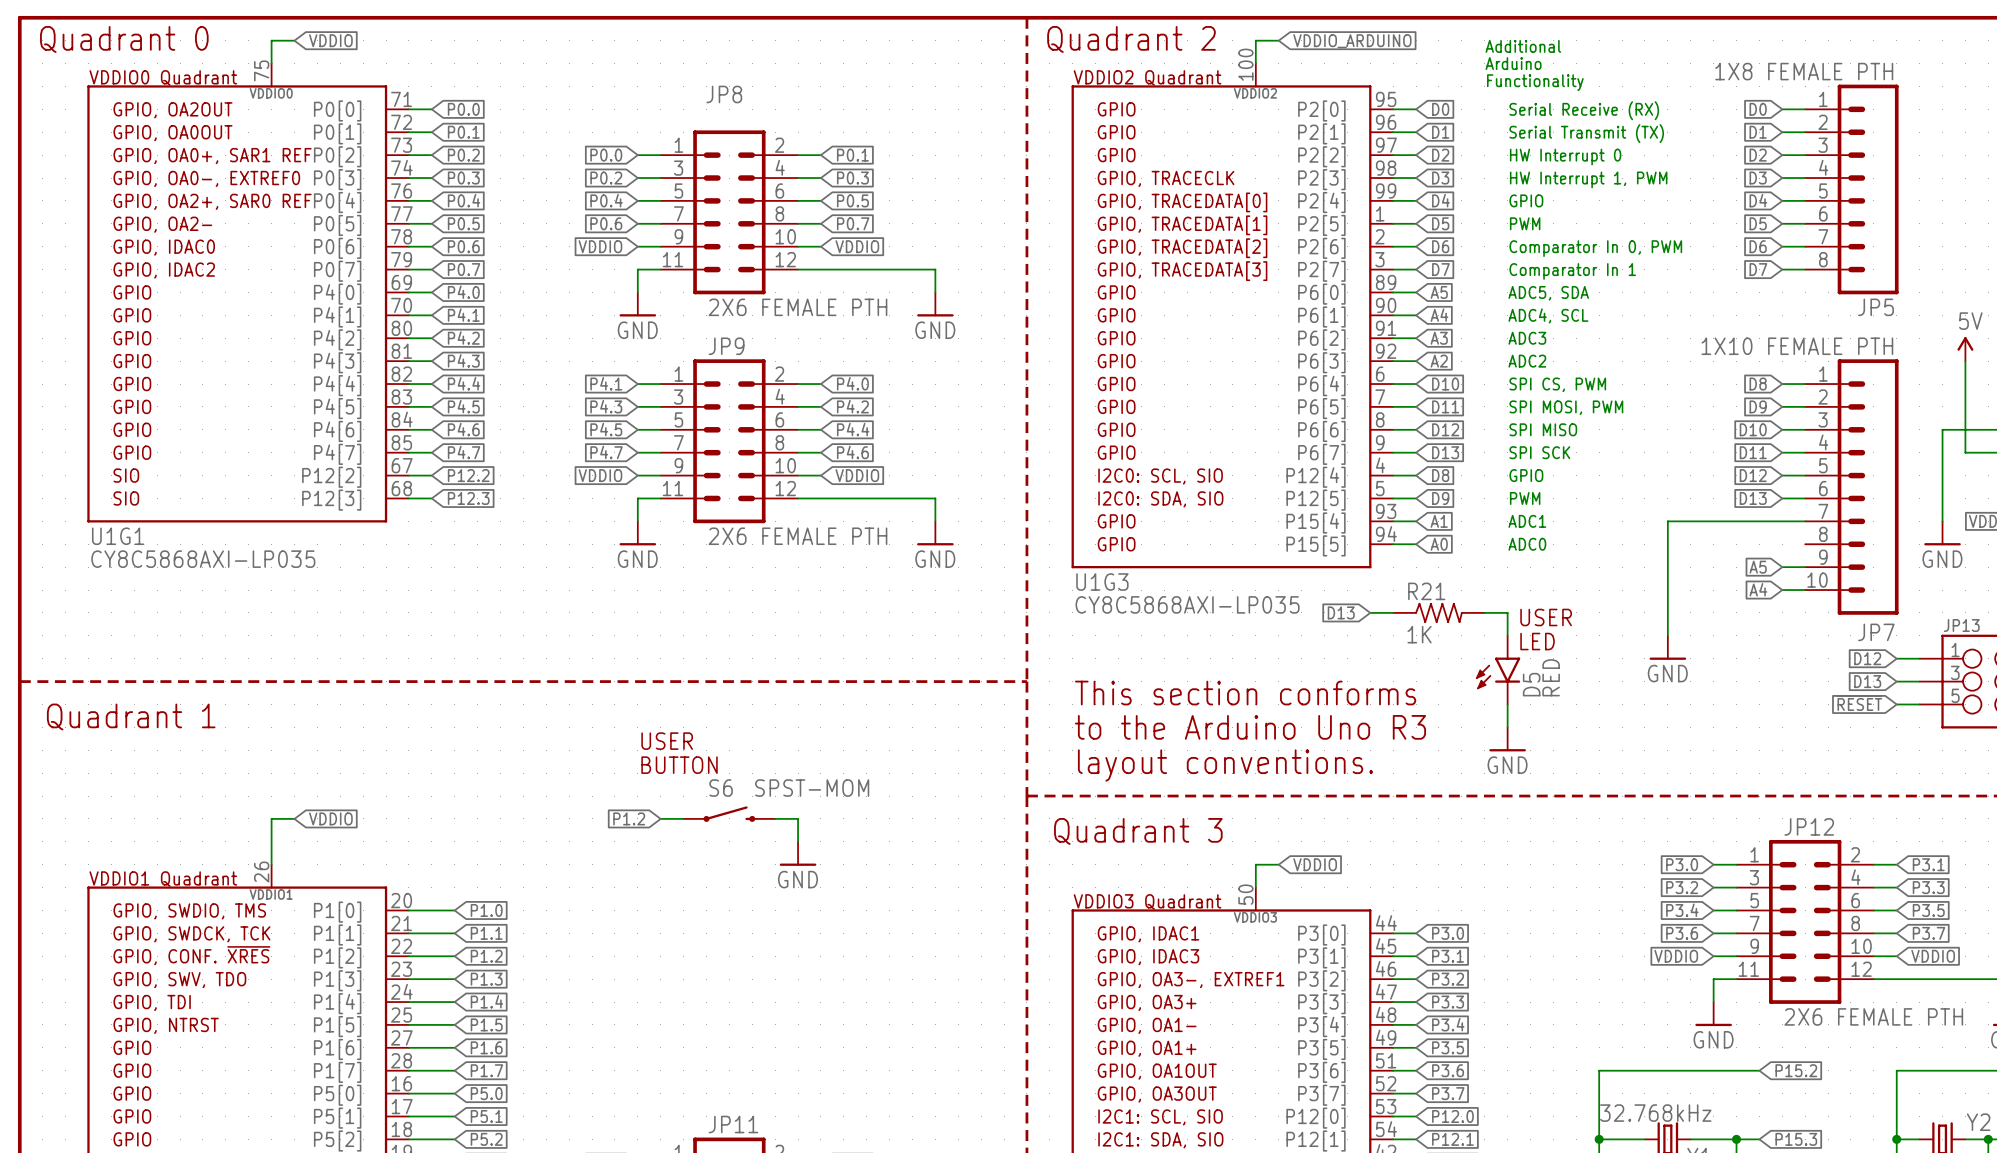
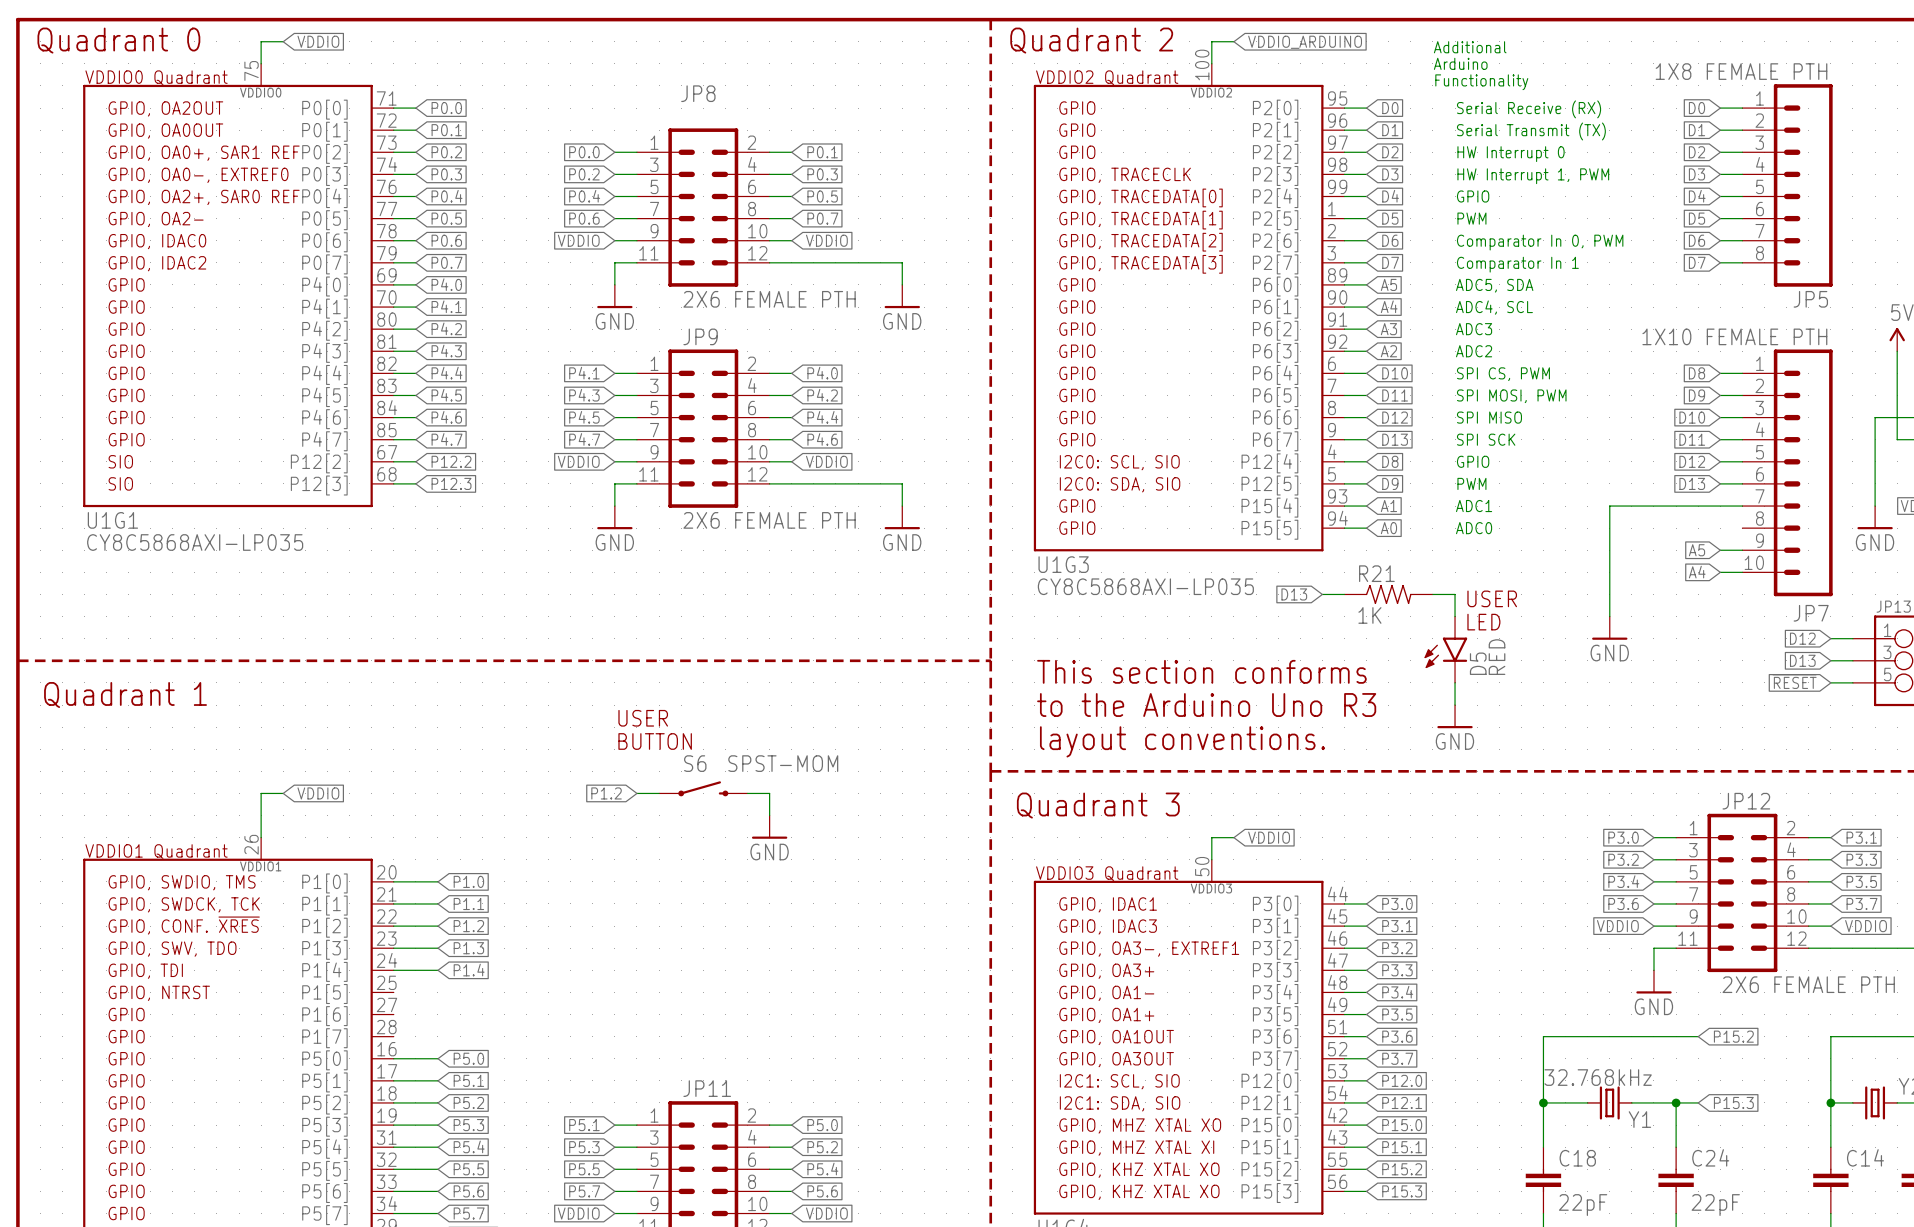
wire: (408, 1024) (454, 1024) -> none
global label: P1.5 (486, 1024) -> none
wire: (408, 1047) (454, 1047) -> none
global label: P1.6 (486, 1047) -> none
wire: (408, 1070) (454, 1070) -> none
global label: P1.7 (486, 1070) -> none

